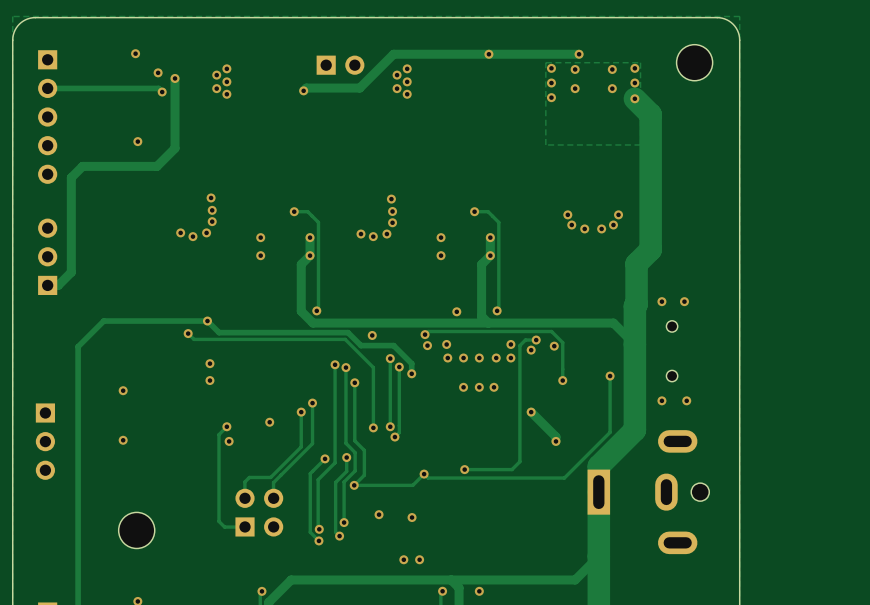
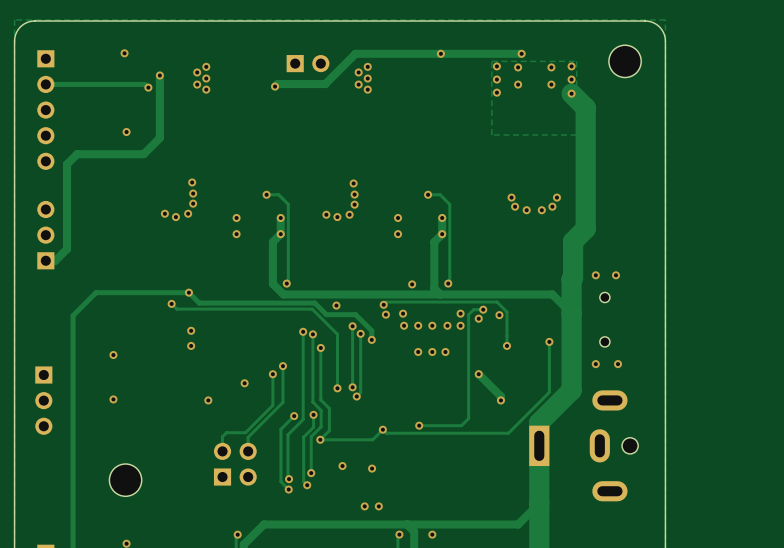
via: (158, 72) -> none
track: (226, 426) (218, 434) (218, 521) (224, 527) (244, 527) -> none
via: (226, 426) -> none

